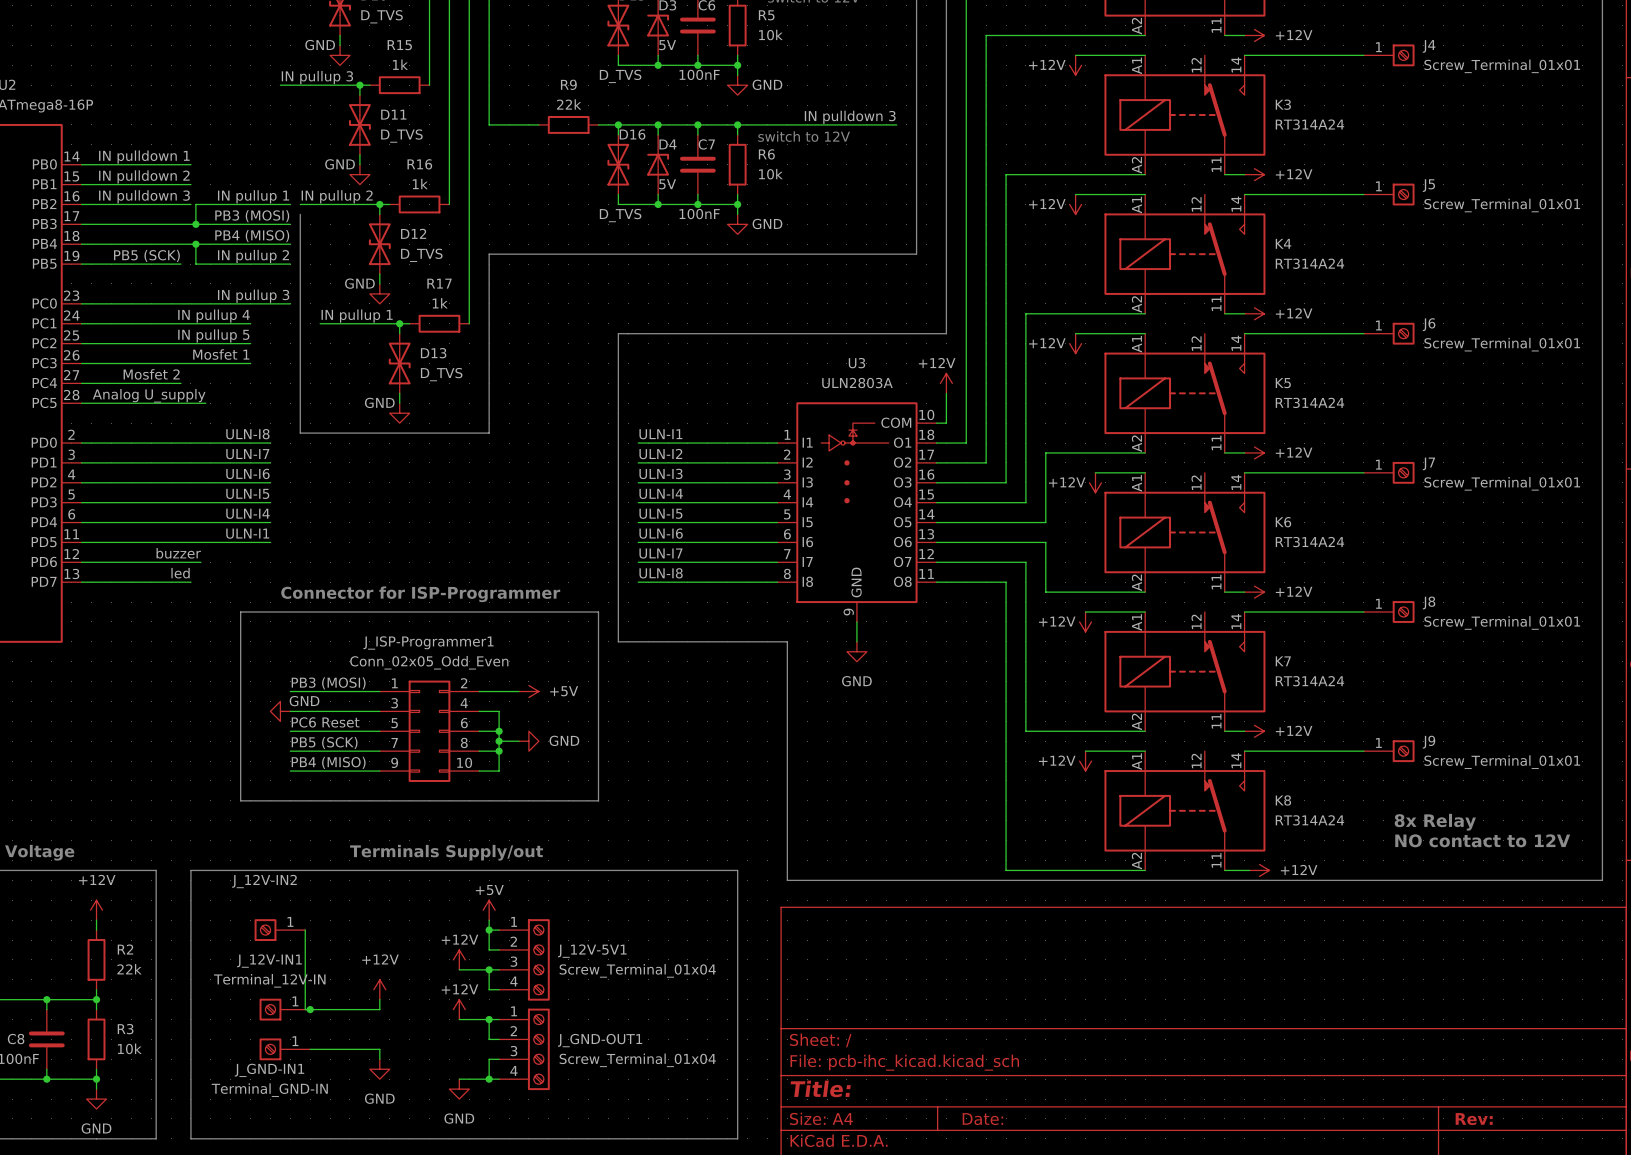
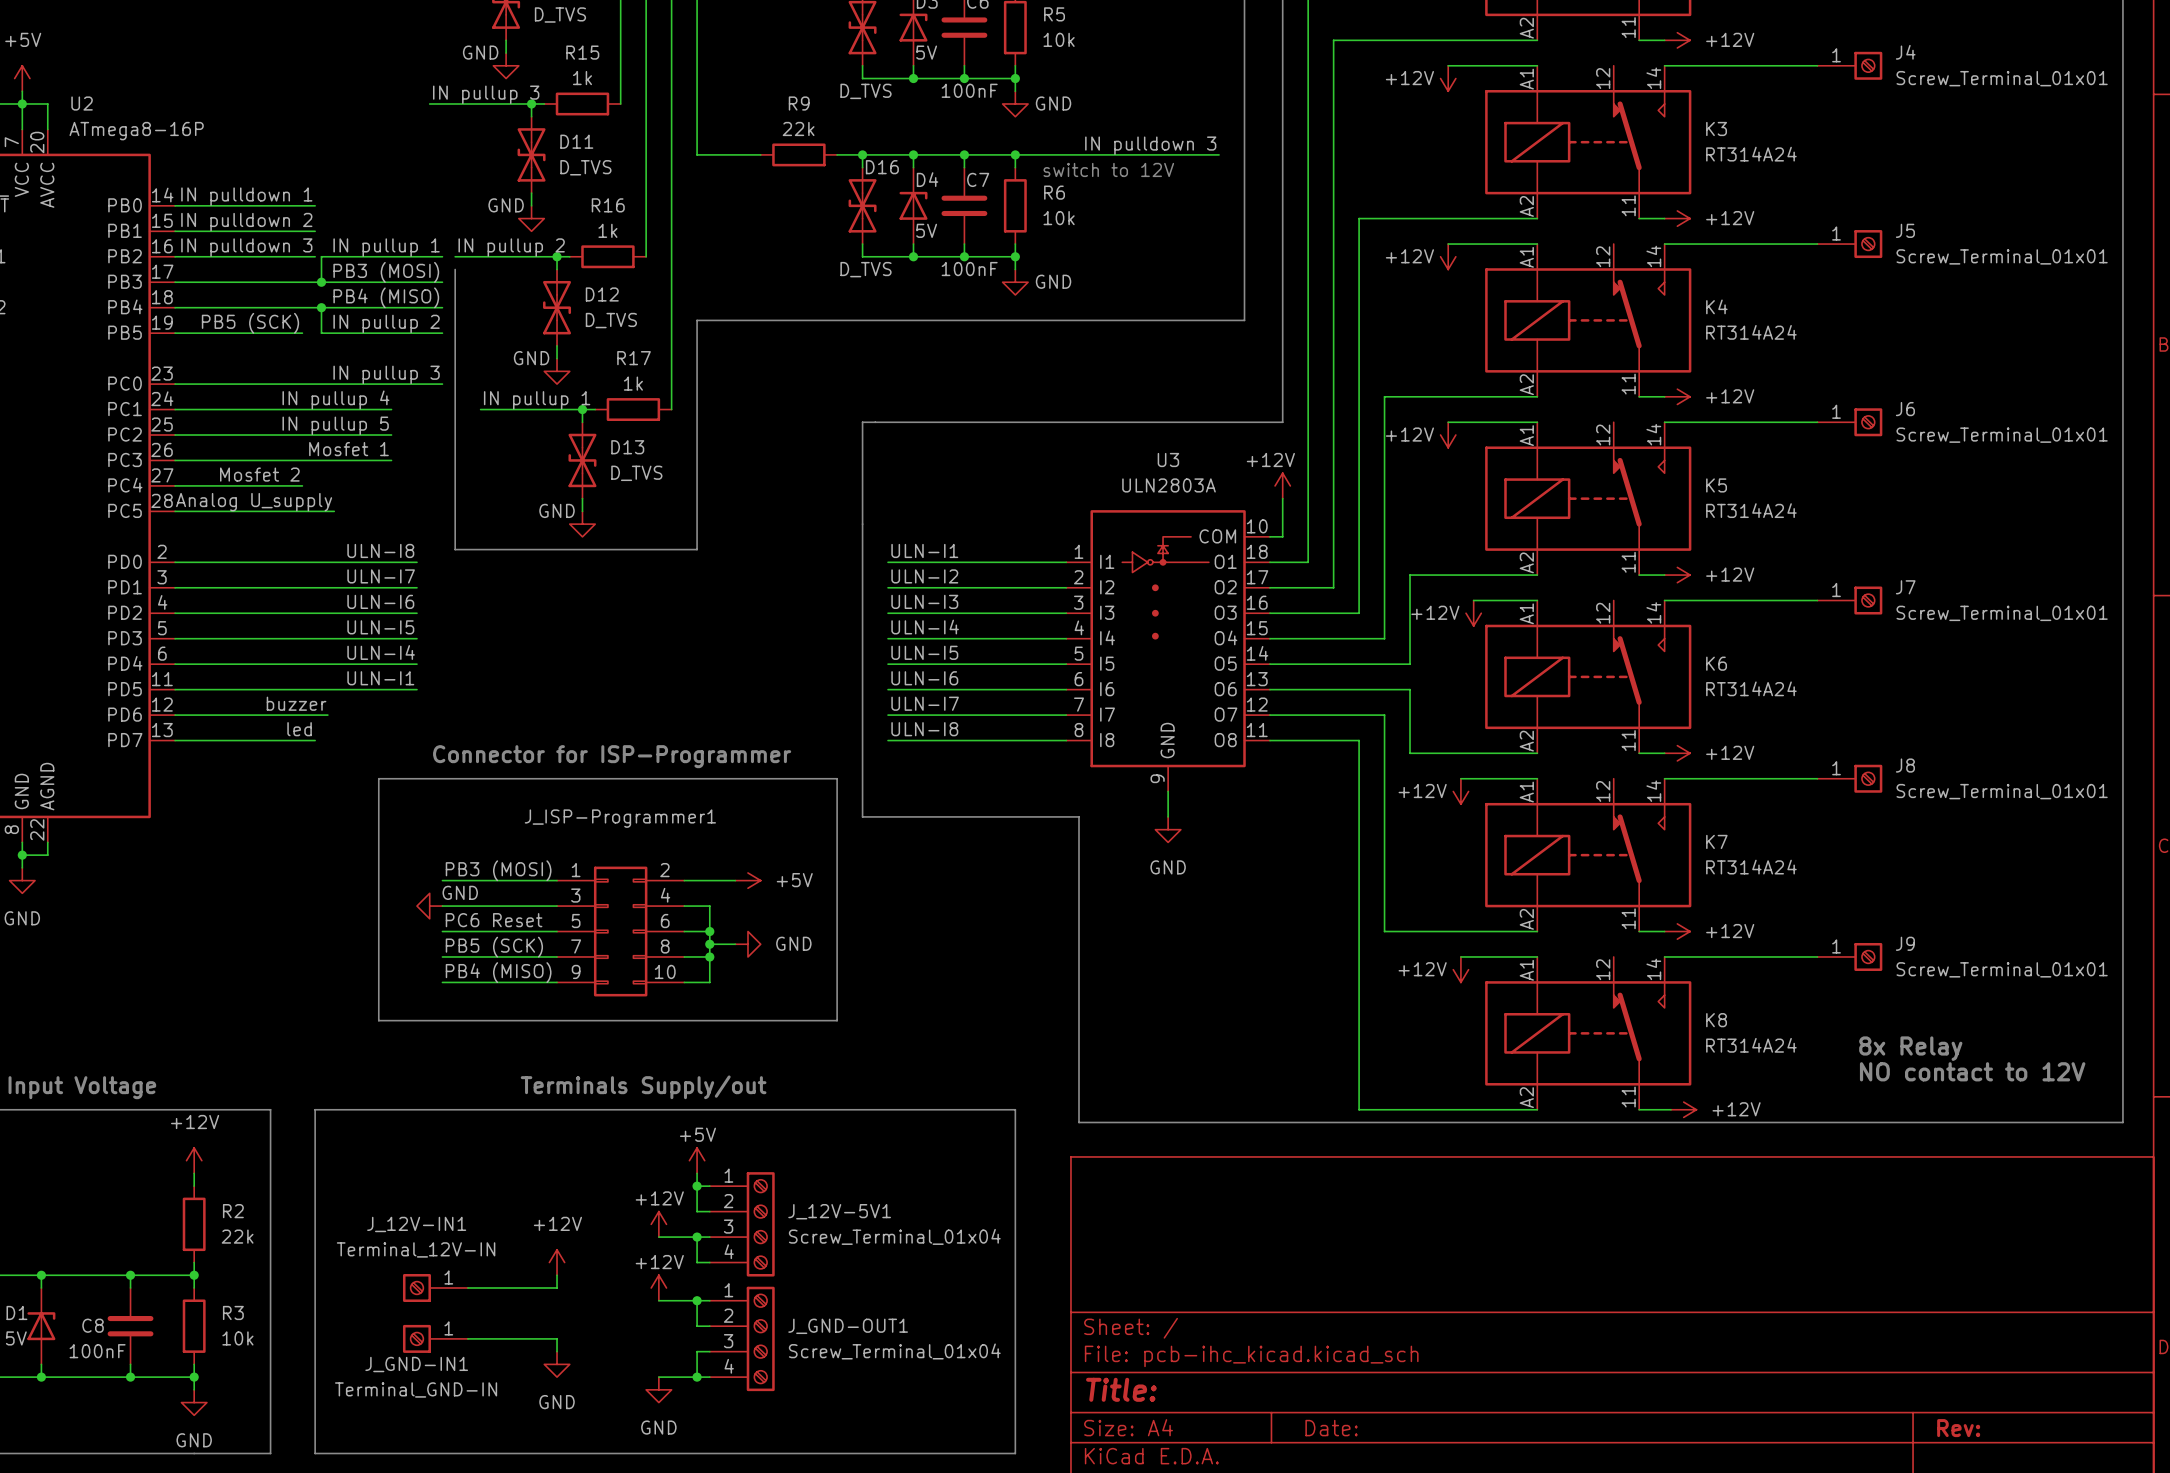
J_ISP-Programmer1 value: Conn_02x05_Odd_Even (429, 662) -> none
J_12V-IN2: (279, 930) -> none
wire: (305, 930) (305, 1009) (310, 1009) -> none
junction: (310, 1009) -> none

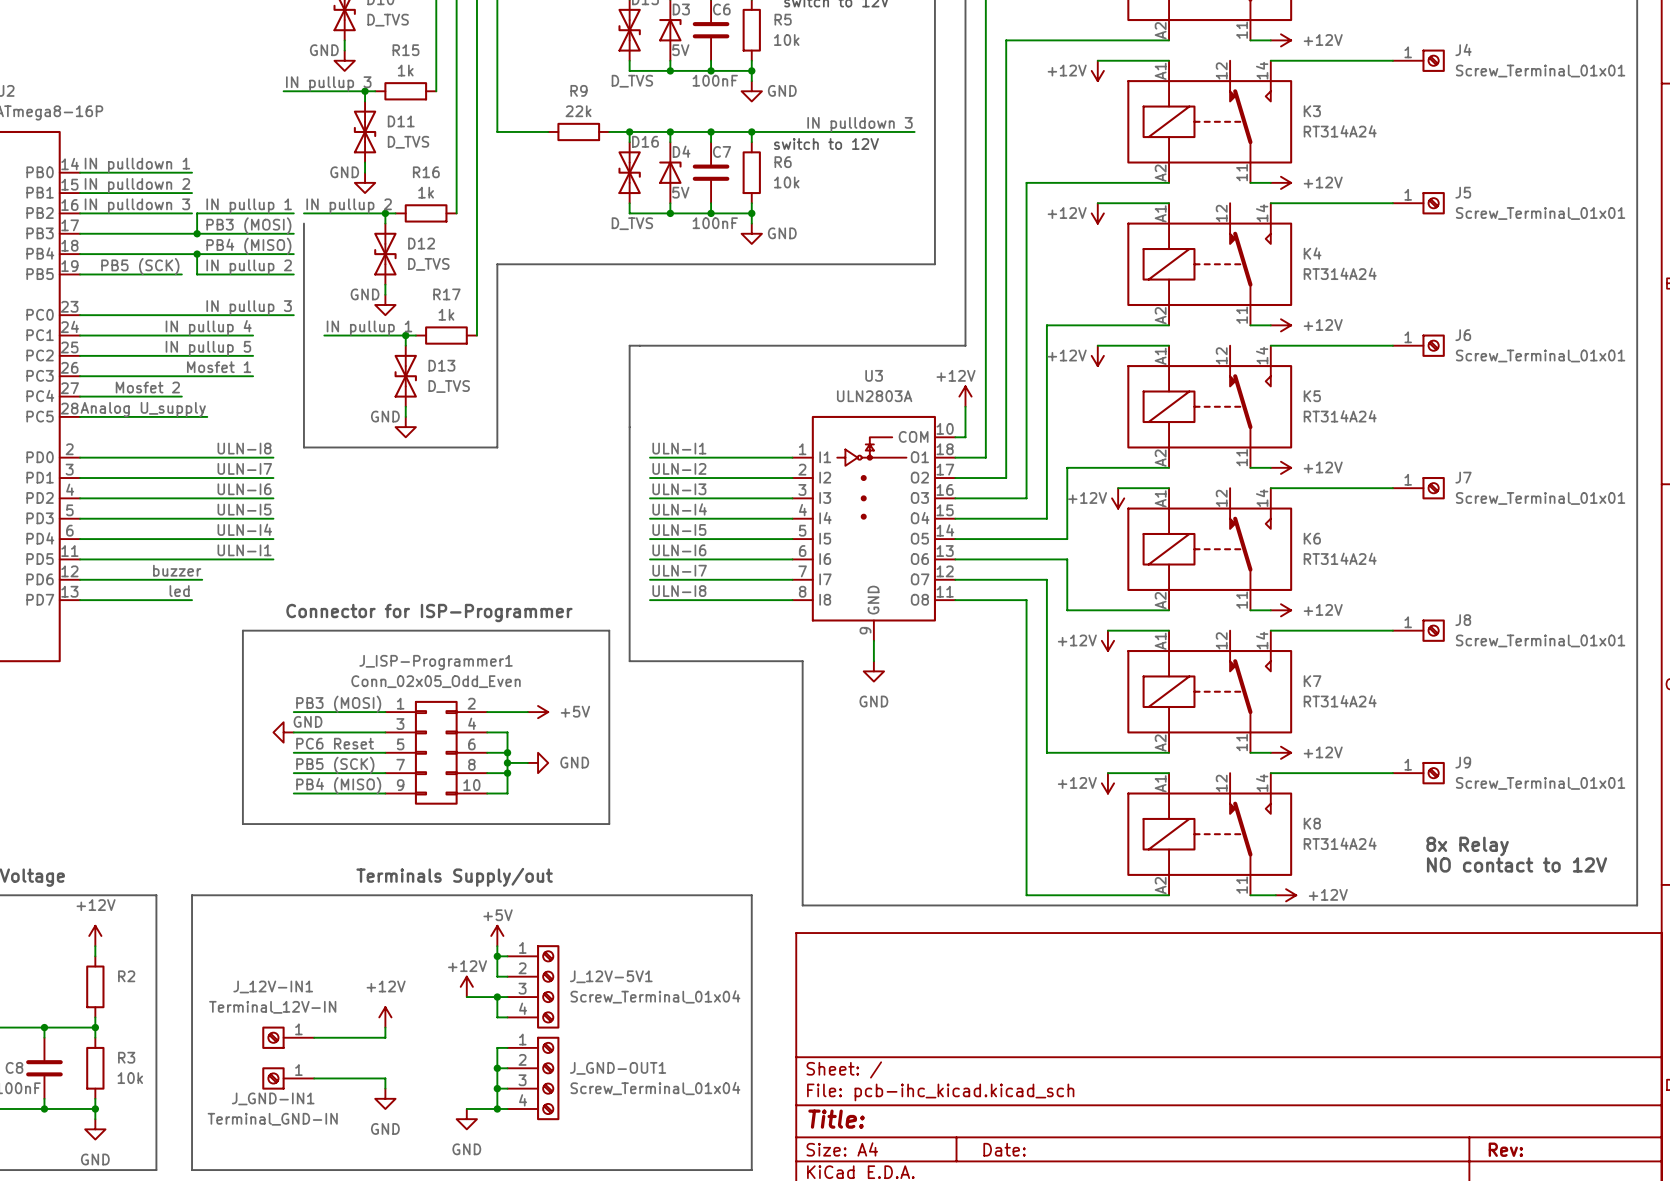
J_ISP-Programmer1 value: none -> Conn_02x05_Odd_Even (436, 681)
R2 value: 22k (237, 1236) -> none
power symbol: +12V (658, 1287) -> none
wire: (658, 1300) (697, 1300) -> none
junction: (697, 1300) -> none
wire: none -> (497, 1068) (497, 1088)
junction: none -> (497, 1068)
junction: none -> (497, 1088)

